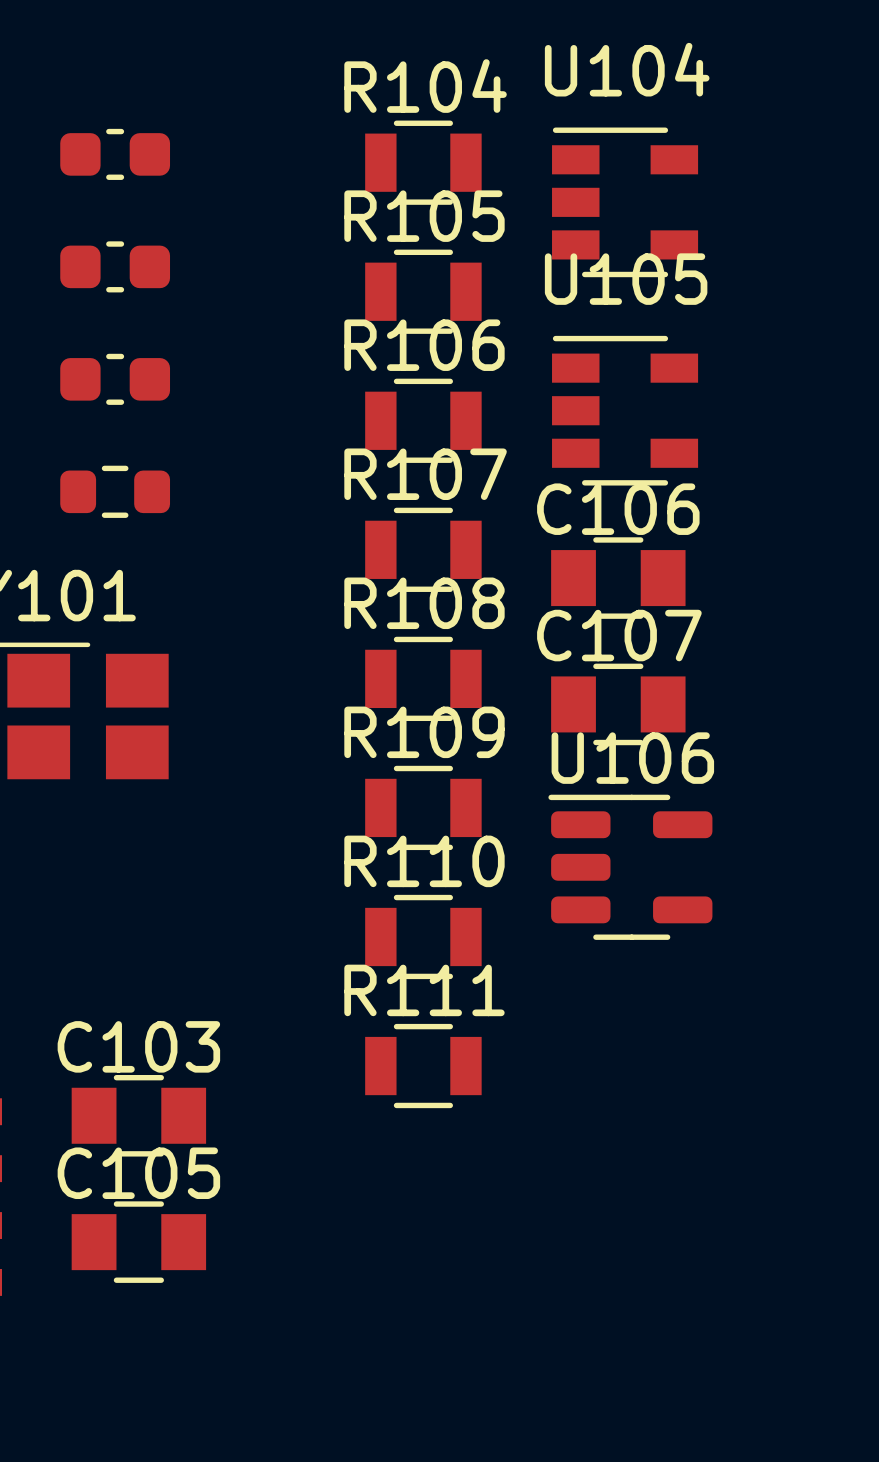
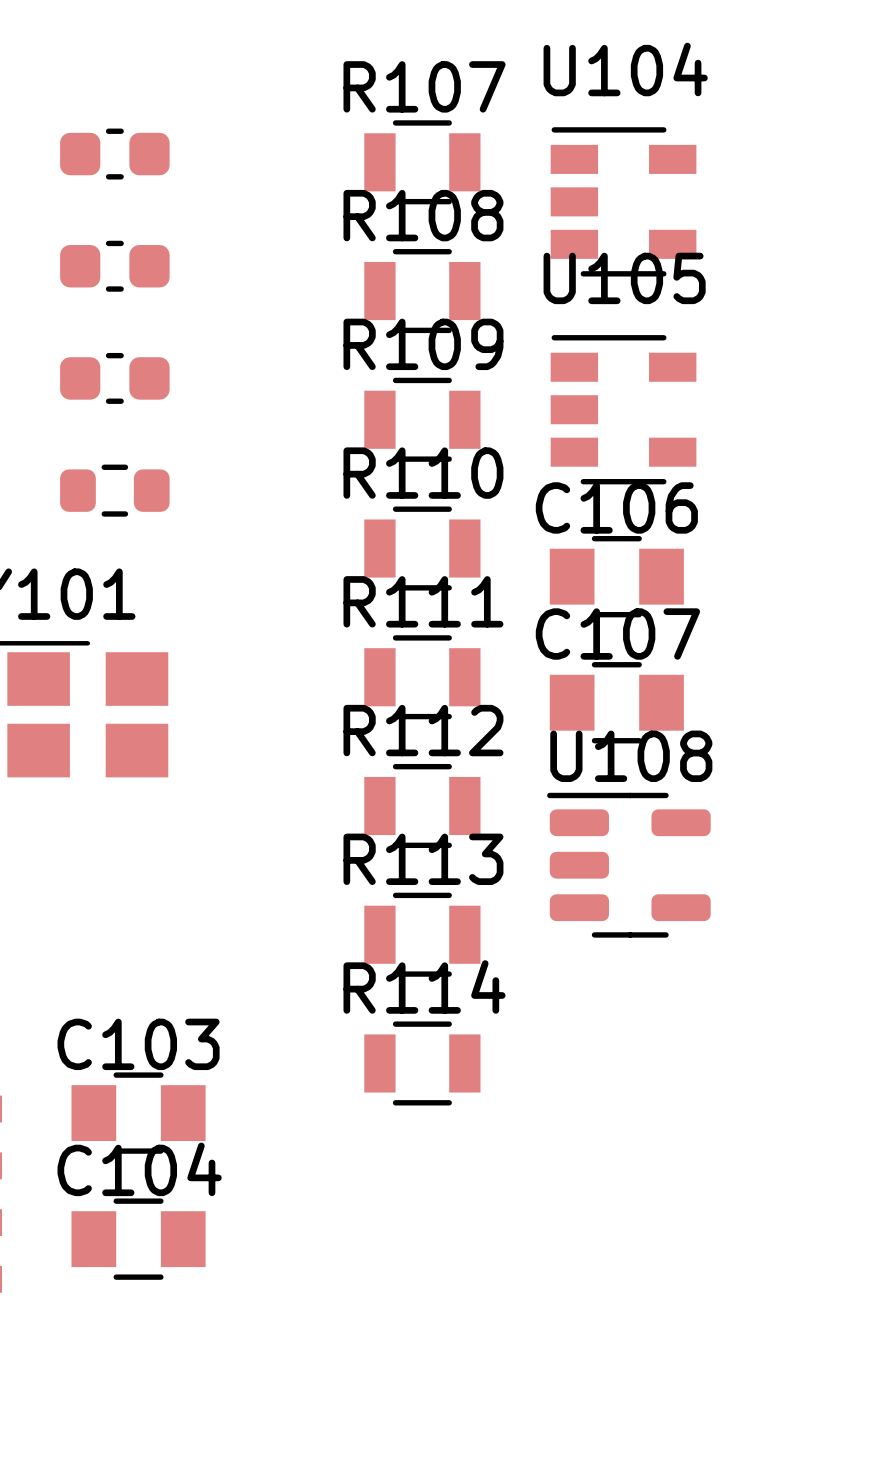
R104 name: R104 (425, 86) -> R107 (424, 86)
R105 name: R105 (424, 216) -> R108 (423, 215)
R106 name: R106 (424, 345) -> R109 (423, 344)
R107 name: R107 (425, 474) -> R110 (423, 473)
R108 name: R108 (424, 603) -> R111 (423, 601)
R109 name: R109 (424, 732) -> R112 (423, 730)
U106 name: U106 (632, 758) -> U108 (631, 756)
R110 name: R110 (424, 861) -> R113 (423, 859)
R111 name: R111 (424, 990) -> R114 (424, 986)
C105 name: C105 (138, 1173) -> C104 (139, 1169)

